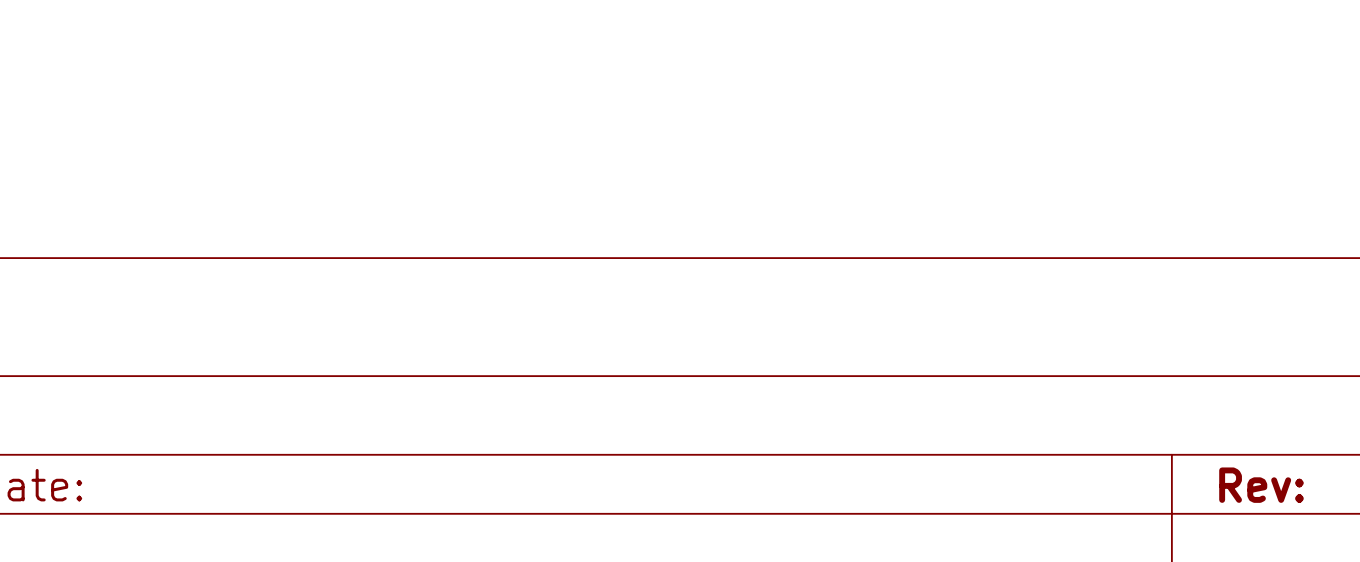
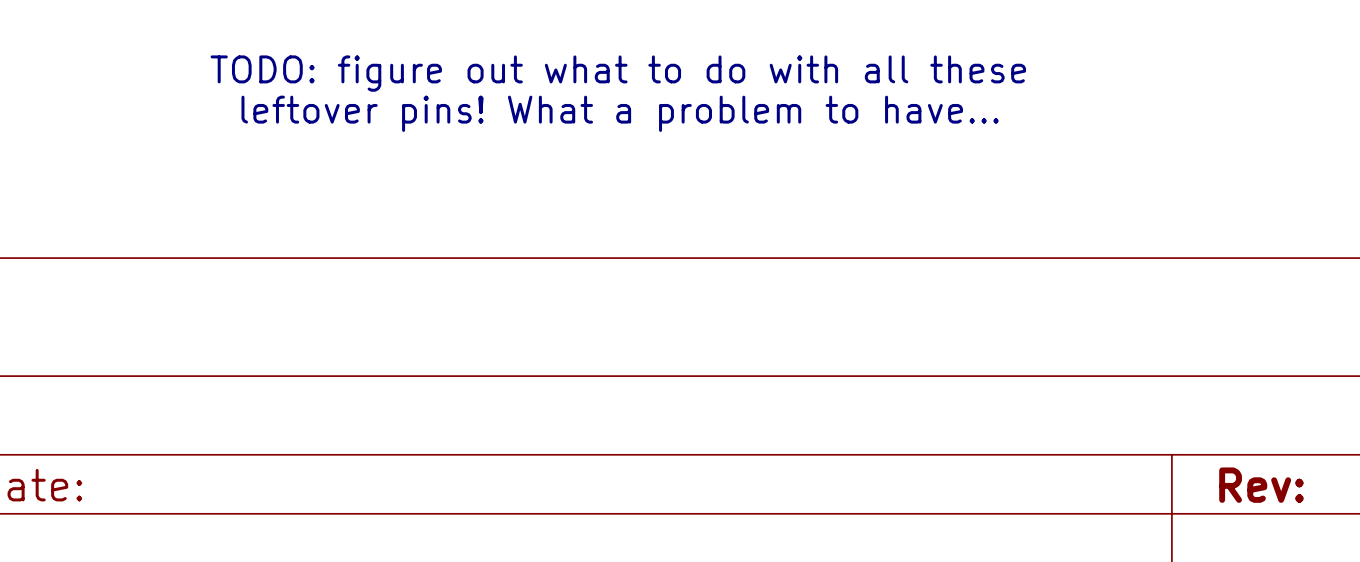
text: none -> TODO: figure out what to do with all these (618, 73)
text: none -> leftover pins! What a problem to have... (620, 113)

